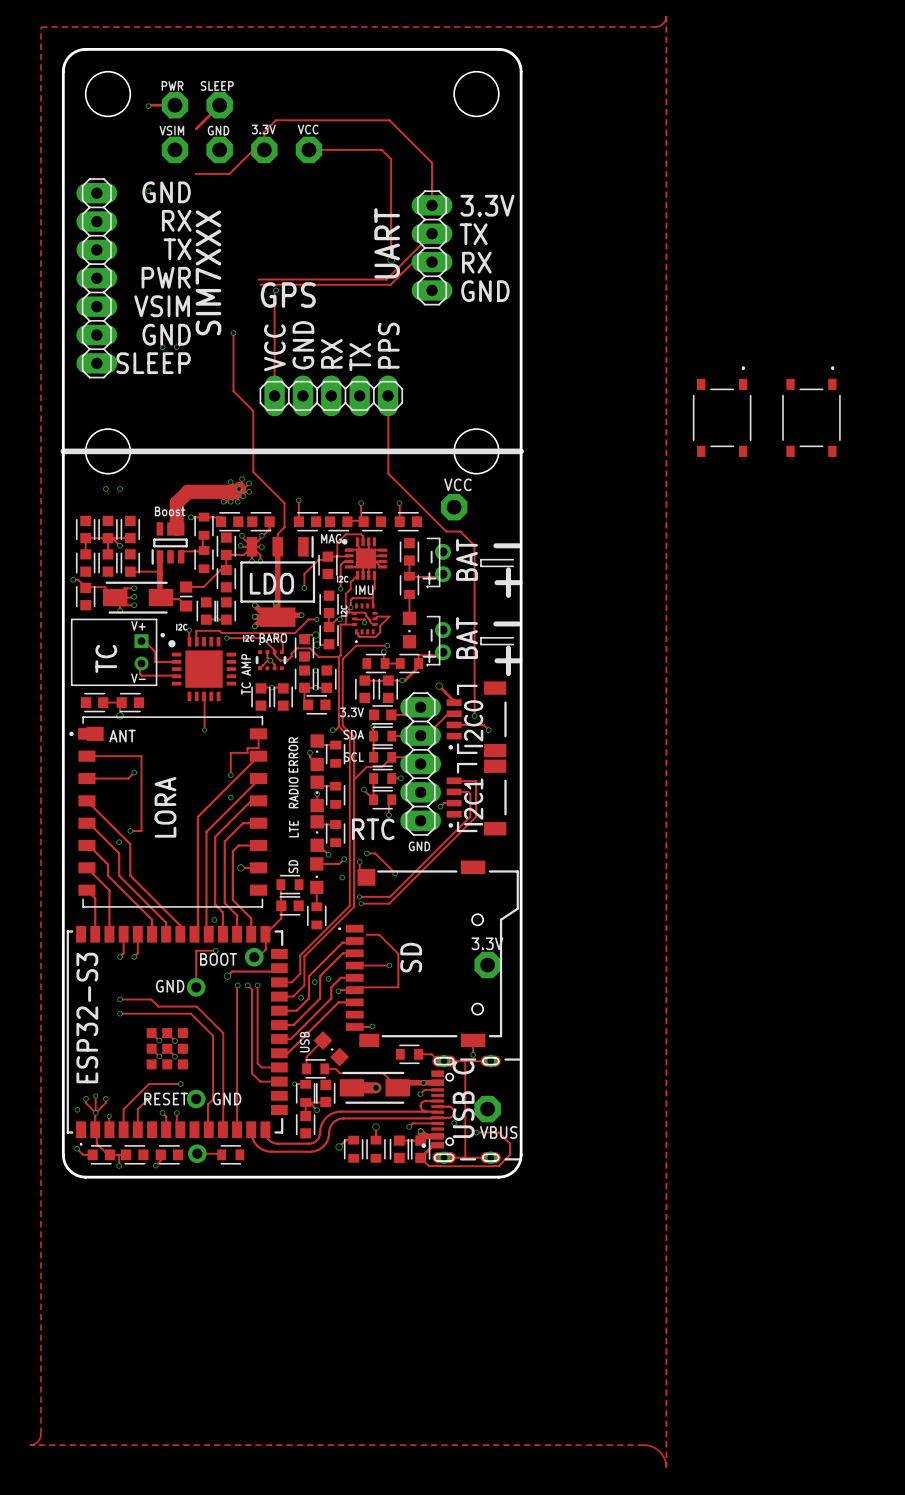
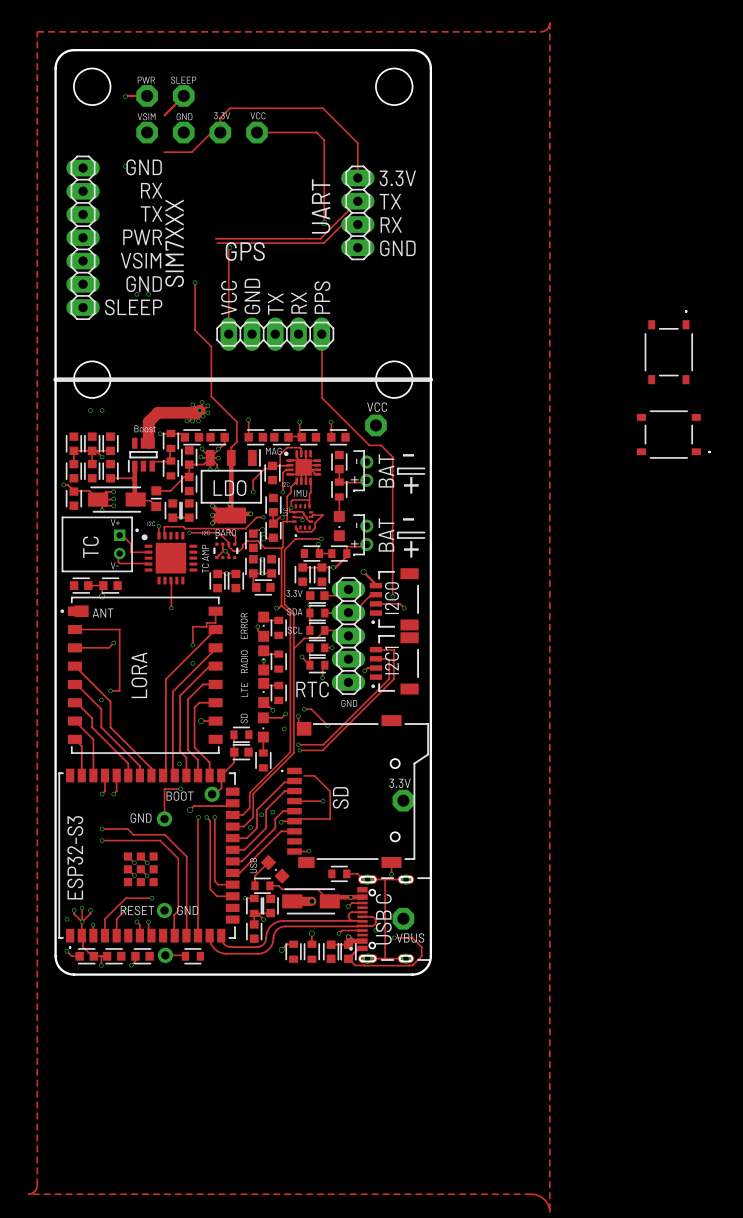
text: RX (331, 353) -> TX (275, 303)
text: TX (360, 357) -> RX (299, 303)
part rotation: 0° (722, 411) -> 90° clockwise (673, 434)
part position: (722, 411) -> (673, 434)

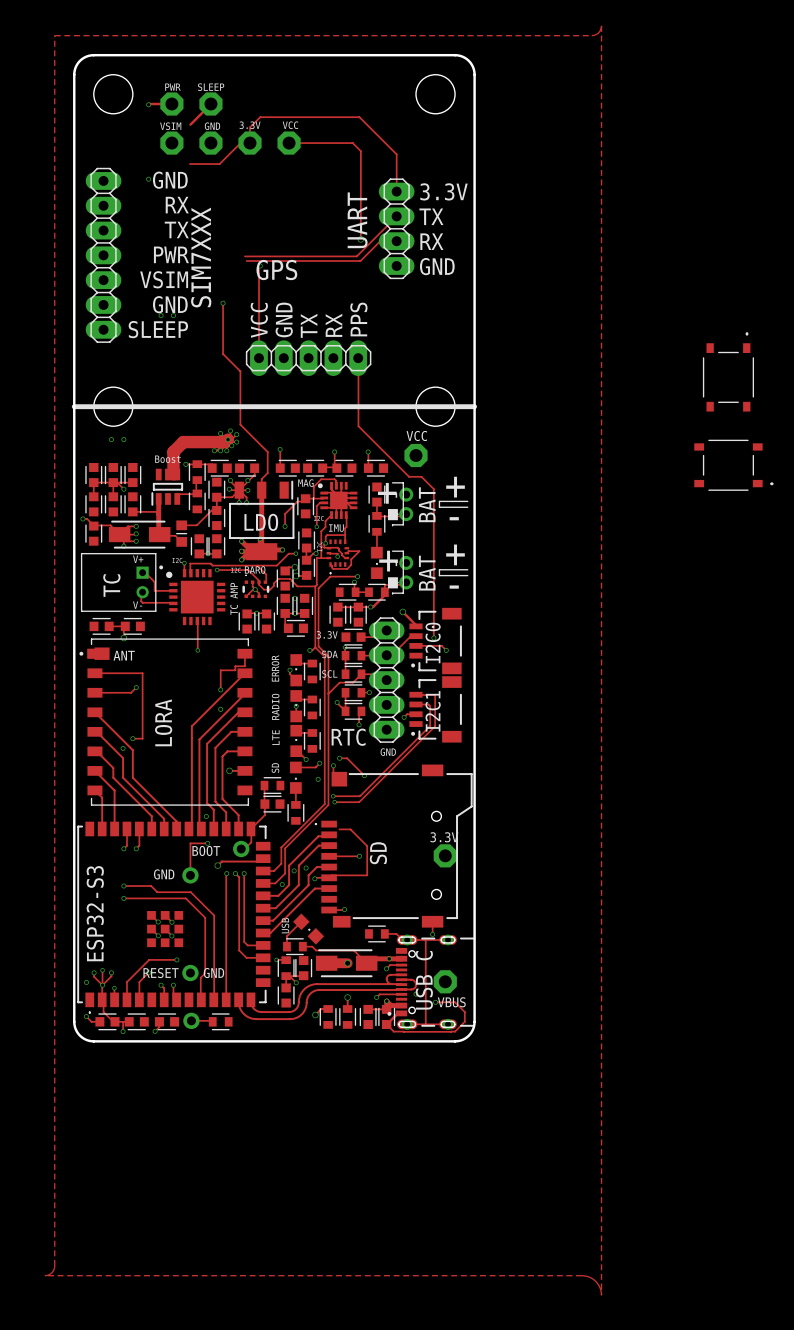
text: - (408, 455) -> + (455, 487)
text: none -> + (387, 493)
drawing: none -> [387, 509, 398, 521]
text: + (411, 485) -> - (454, 518)
text: - (408, 519) -> + (455, 554)
text: none -> + (388, 561)
drawing: none -> [387, 577, 398, 589]
text: + (411, 549) -> - (454, 587)

